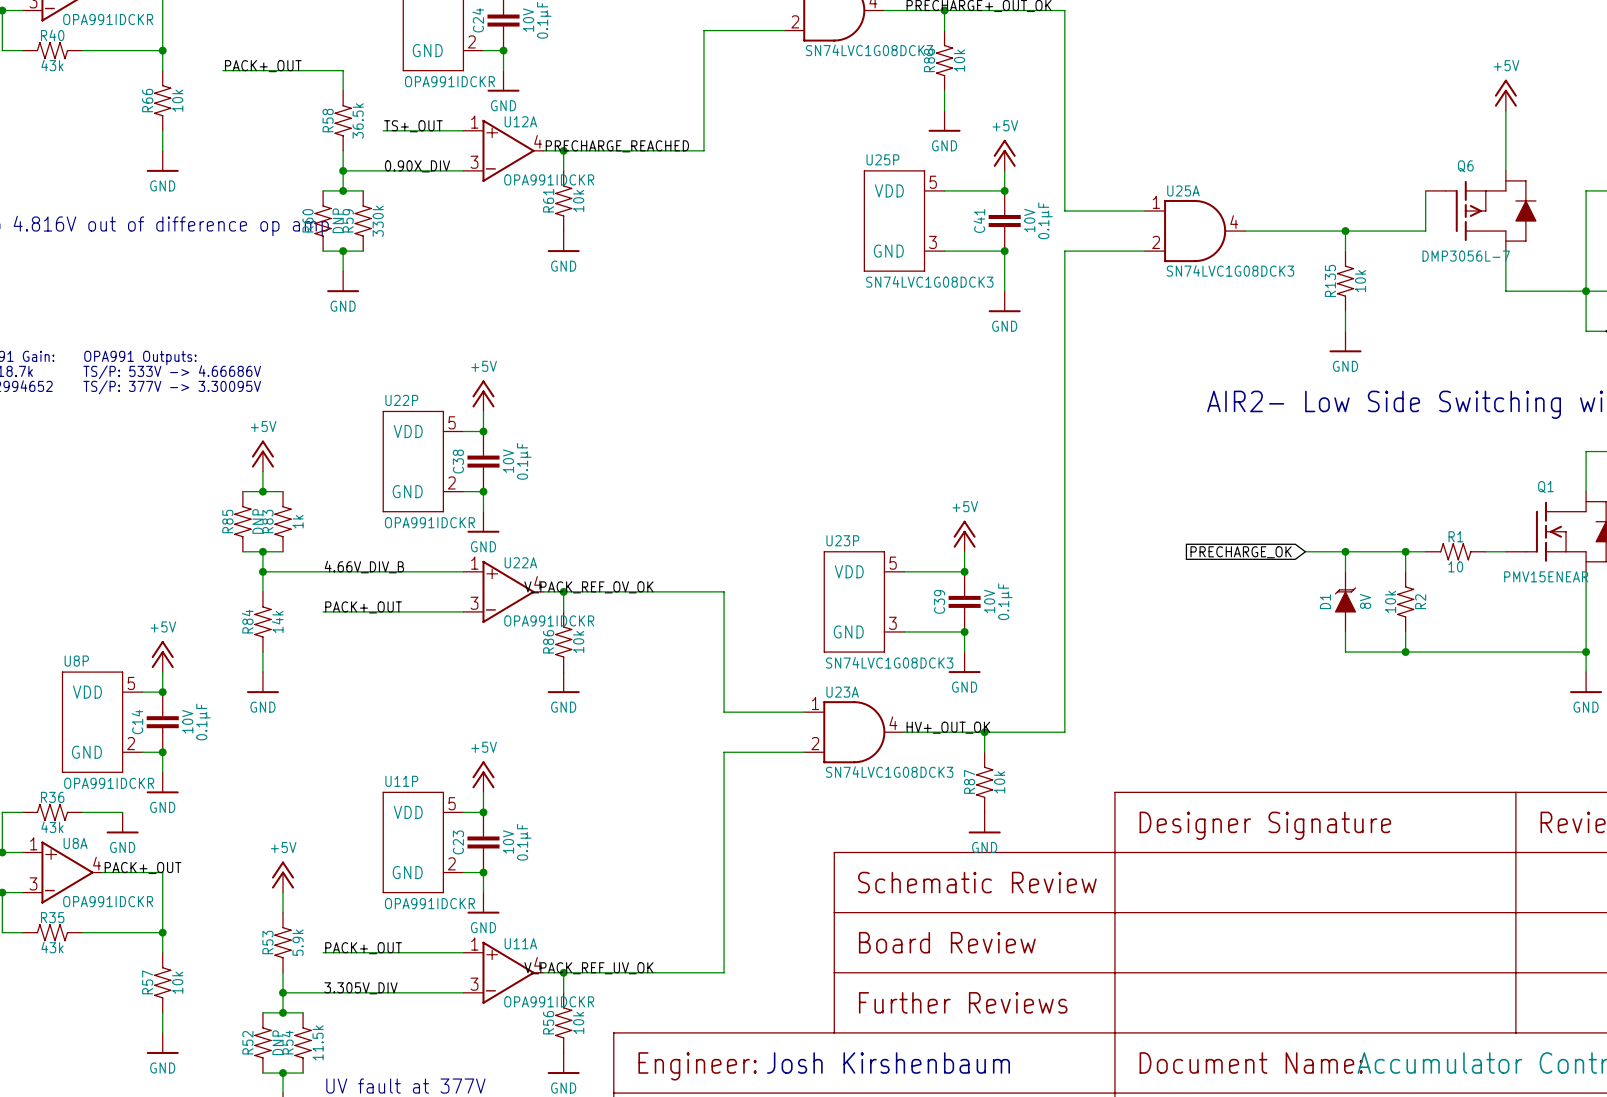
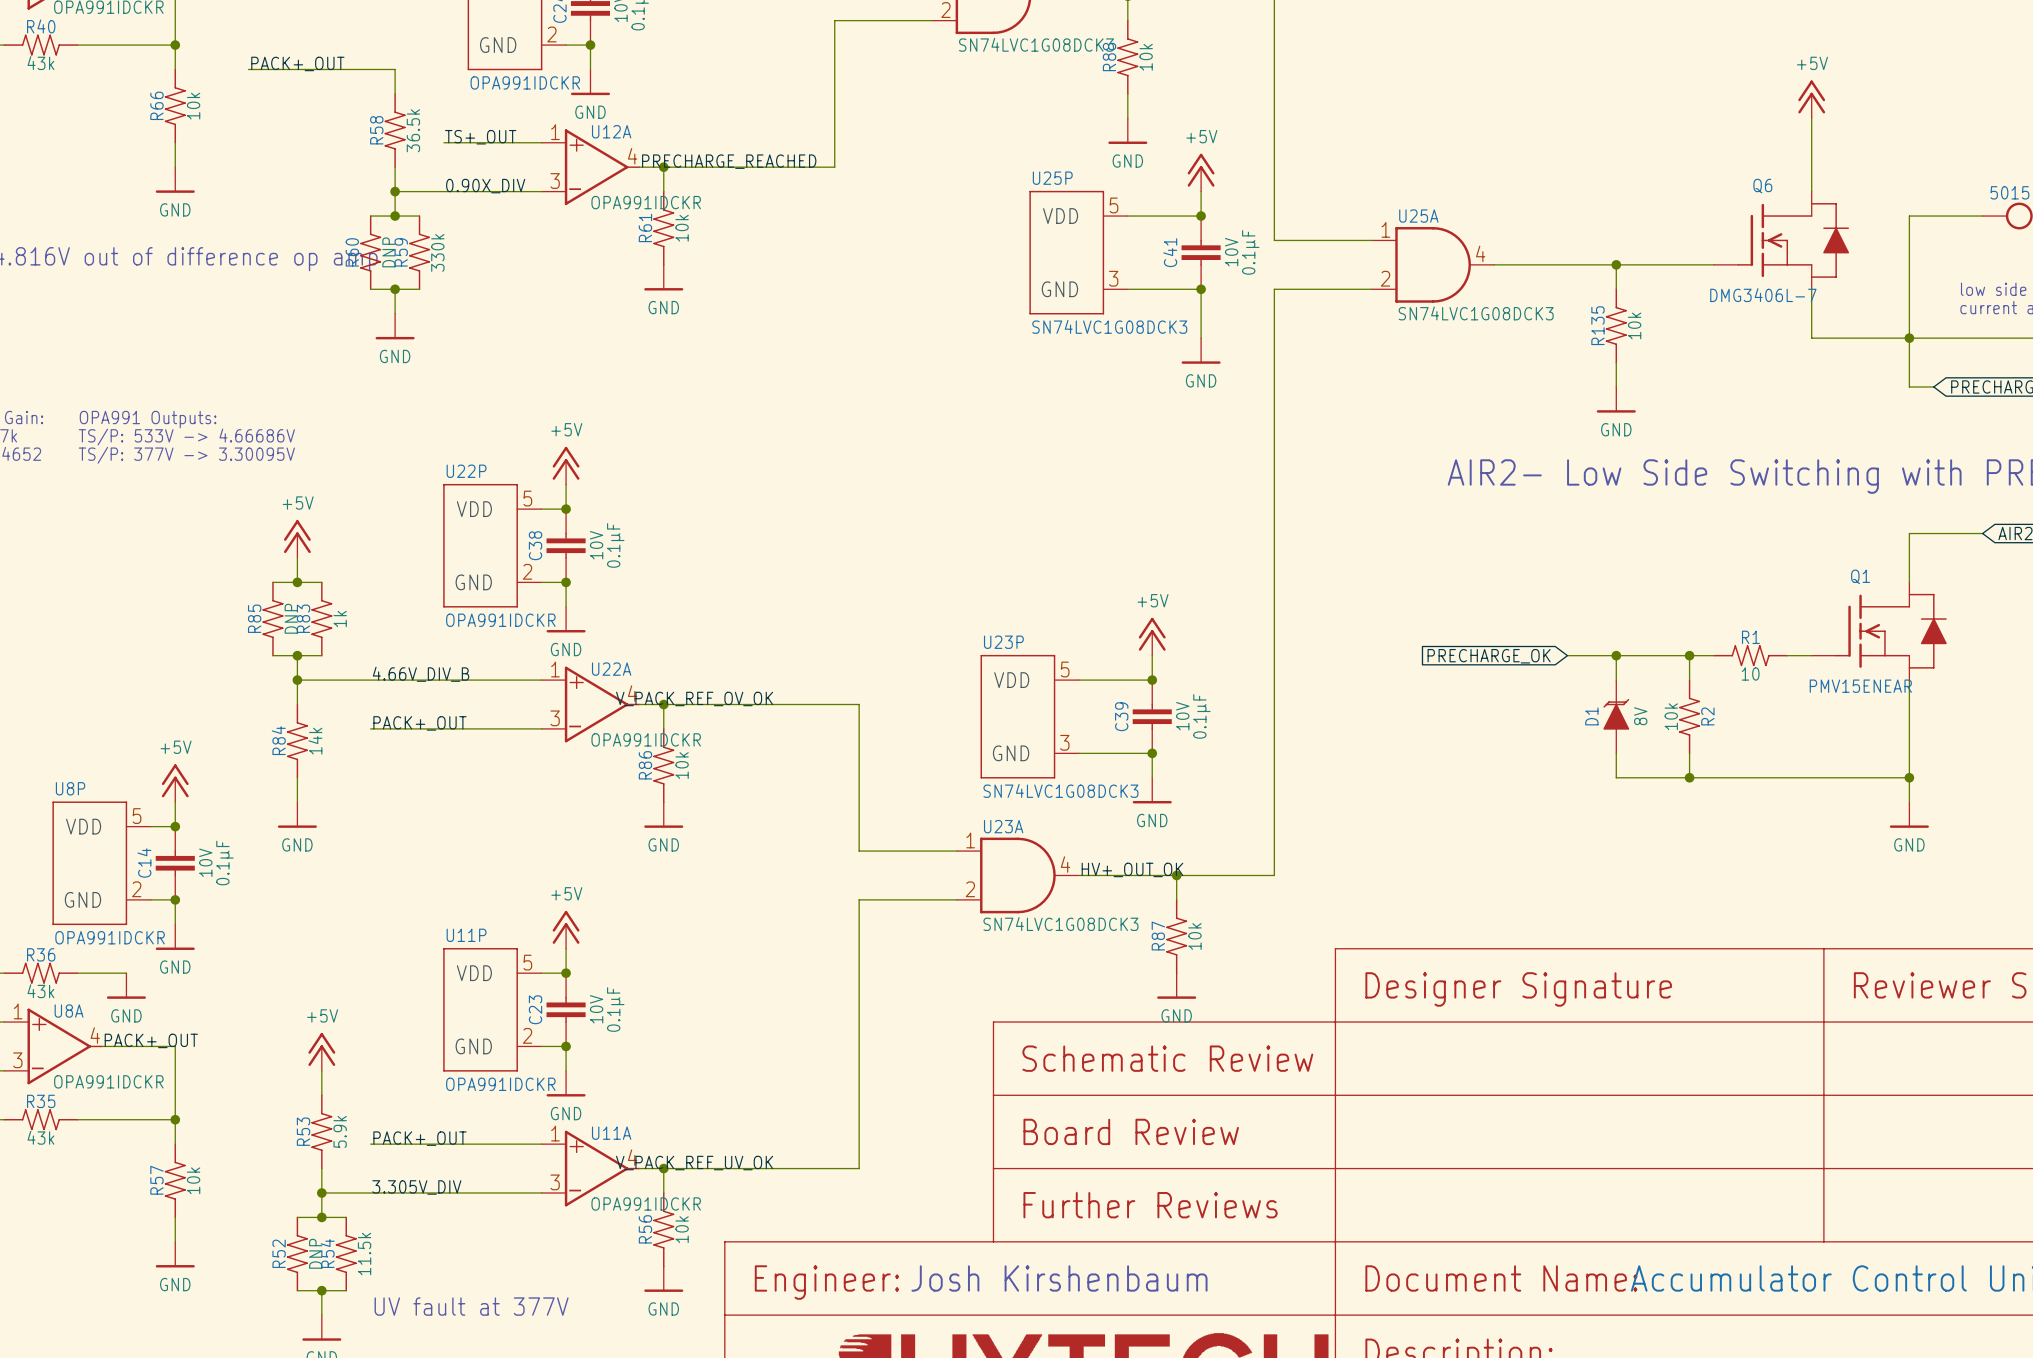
Q6 symbol: [1425, 170, 1537, 252] -> [1713, 191, 1850, 290]
wire: (1425, 190) (1425, 231) -> none
Q6 text: DMP3056L-7 (1466, 256) -> DMG3406L-7 (1763, 295)

